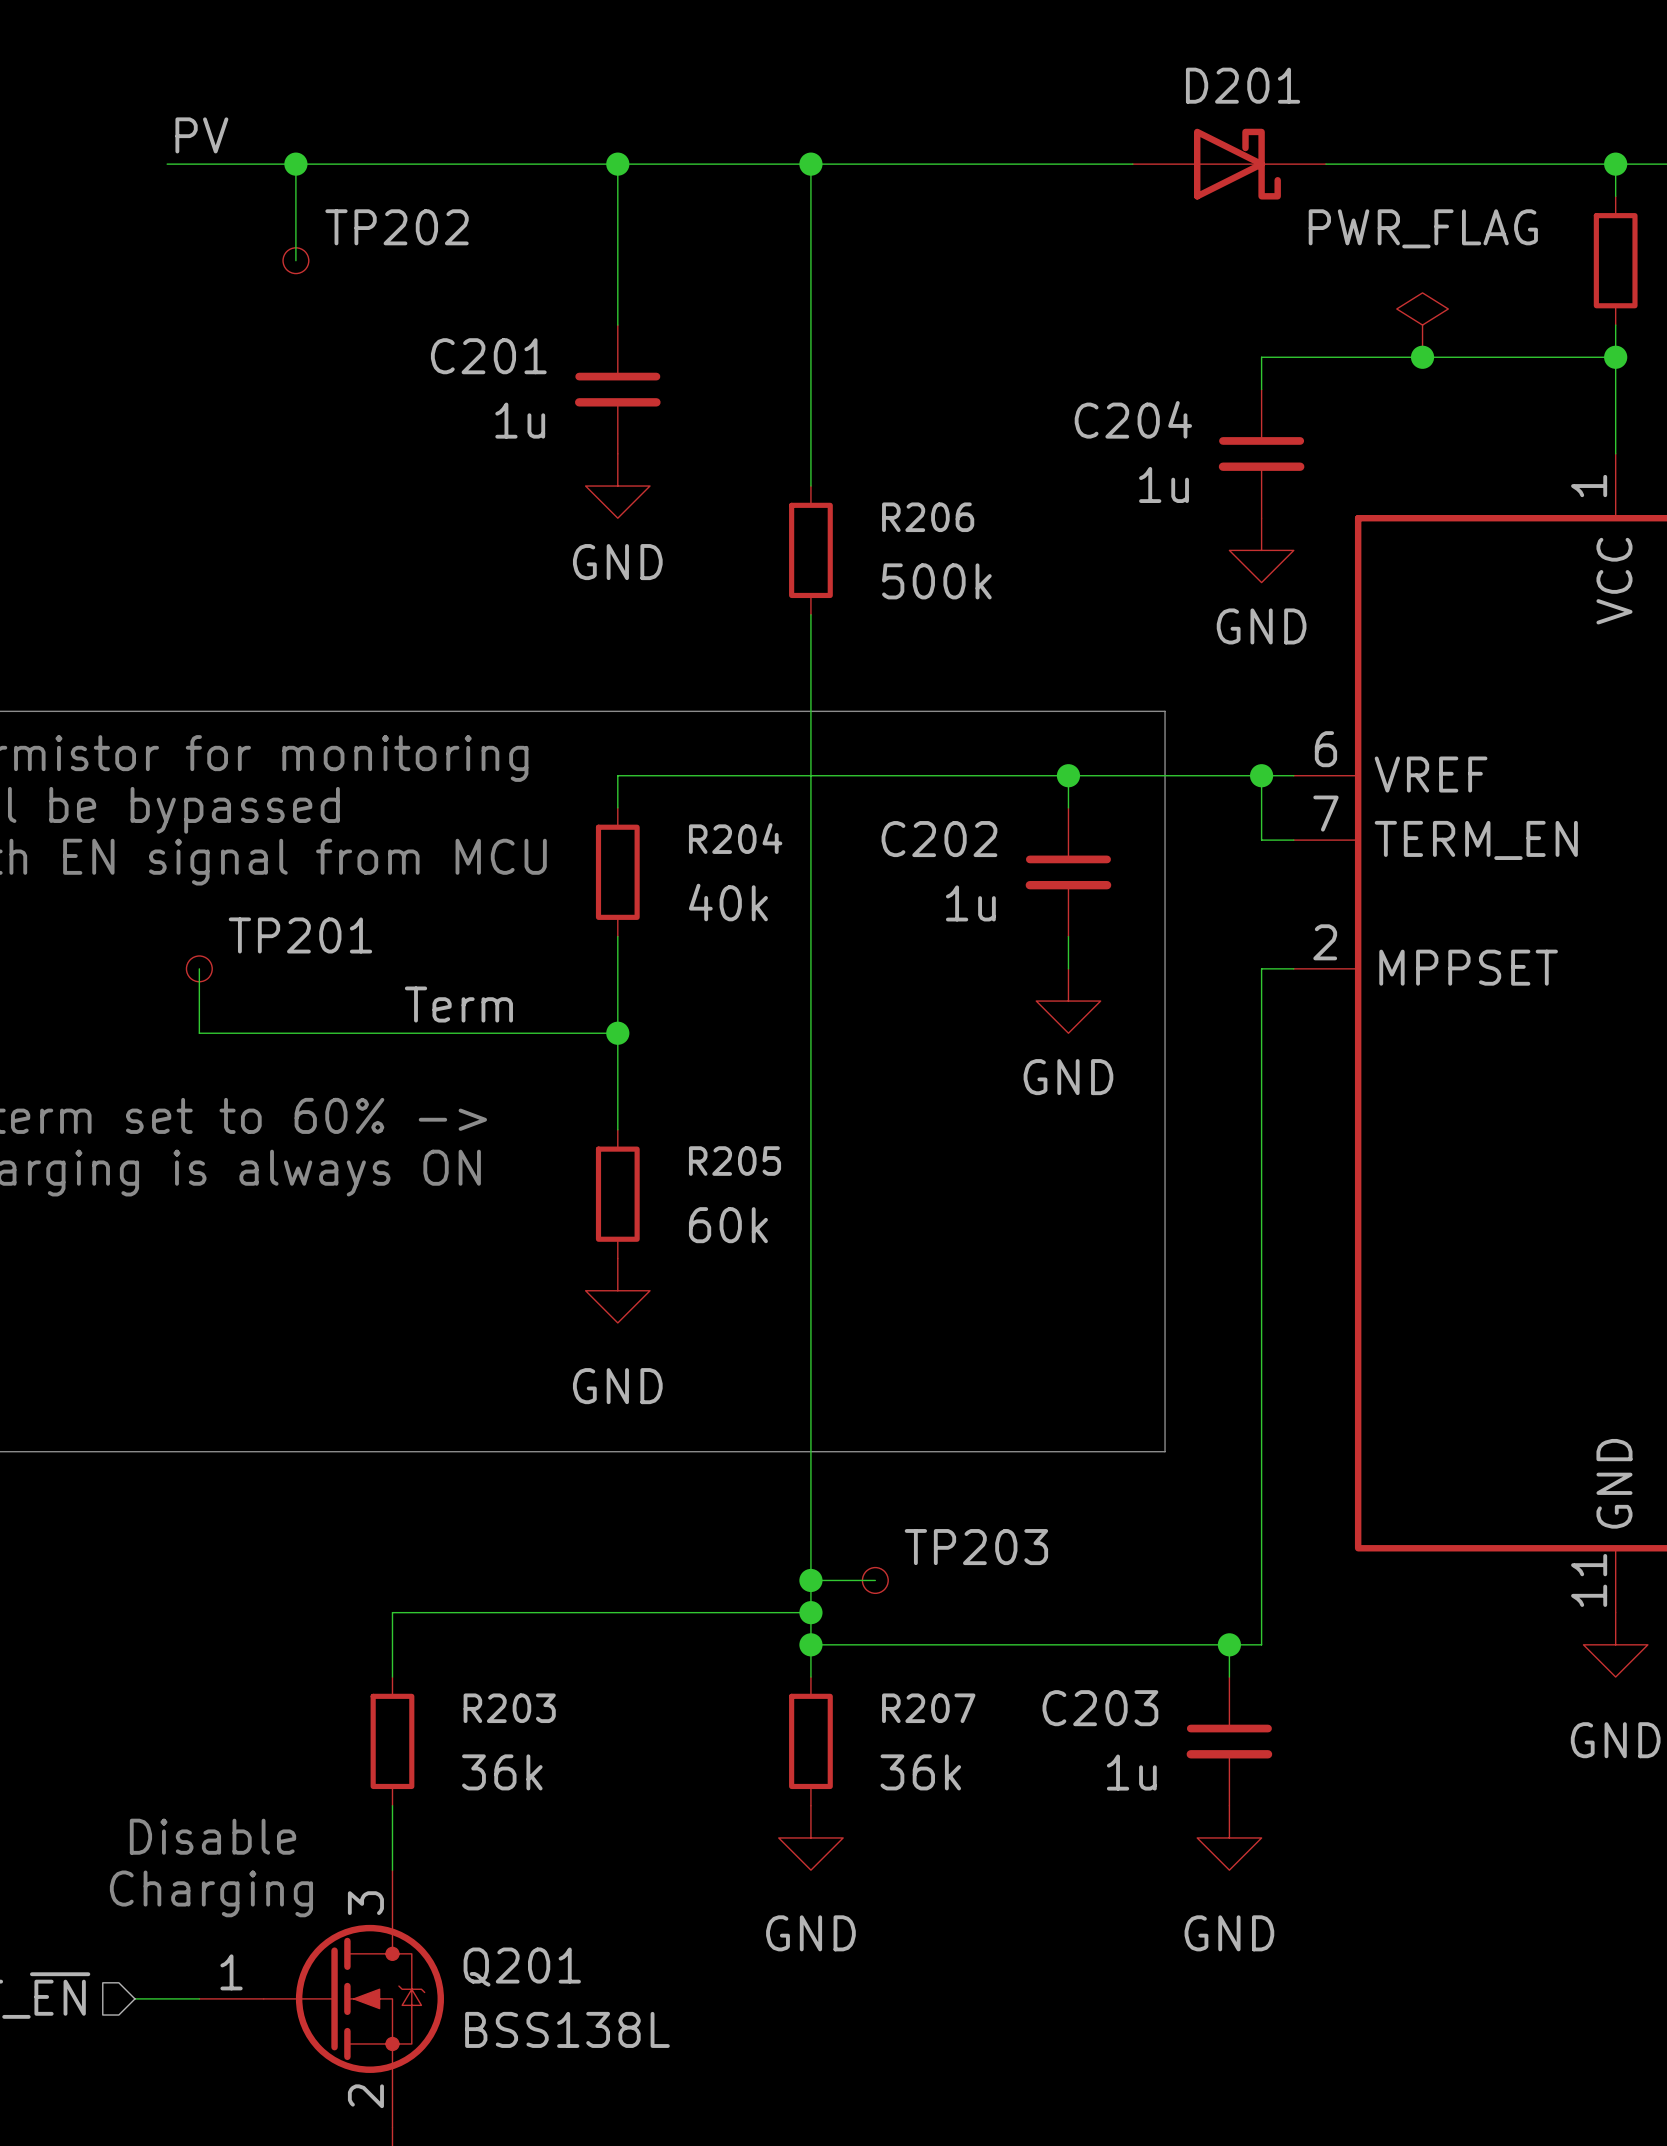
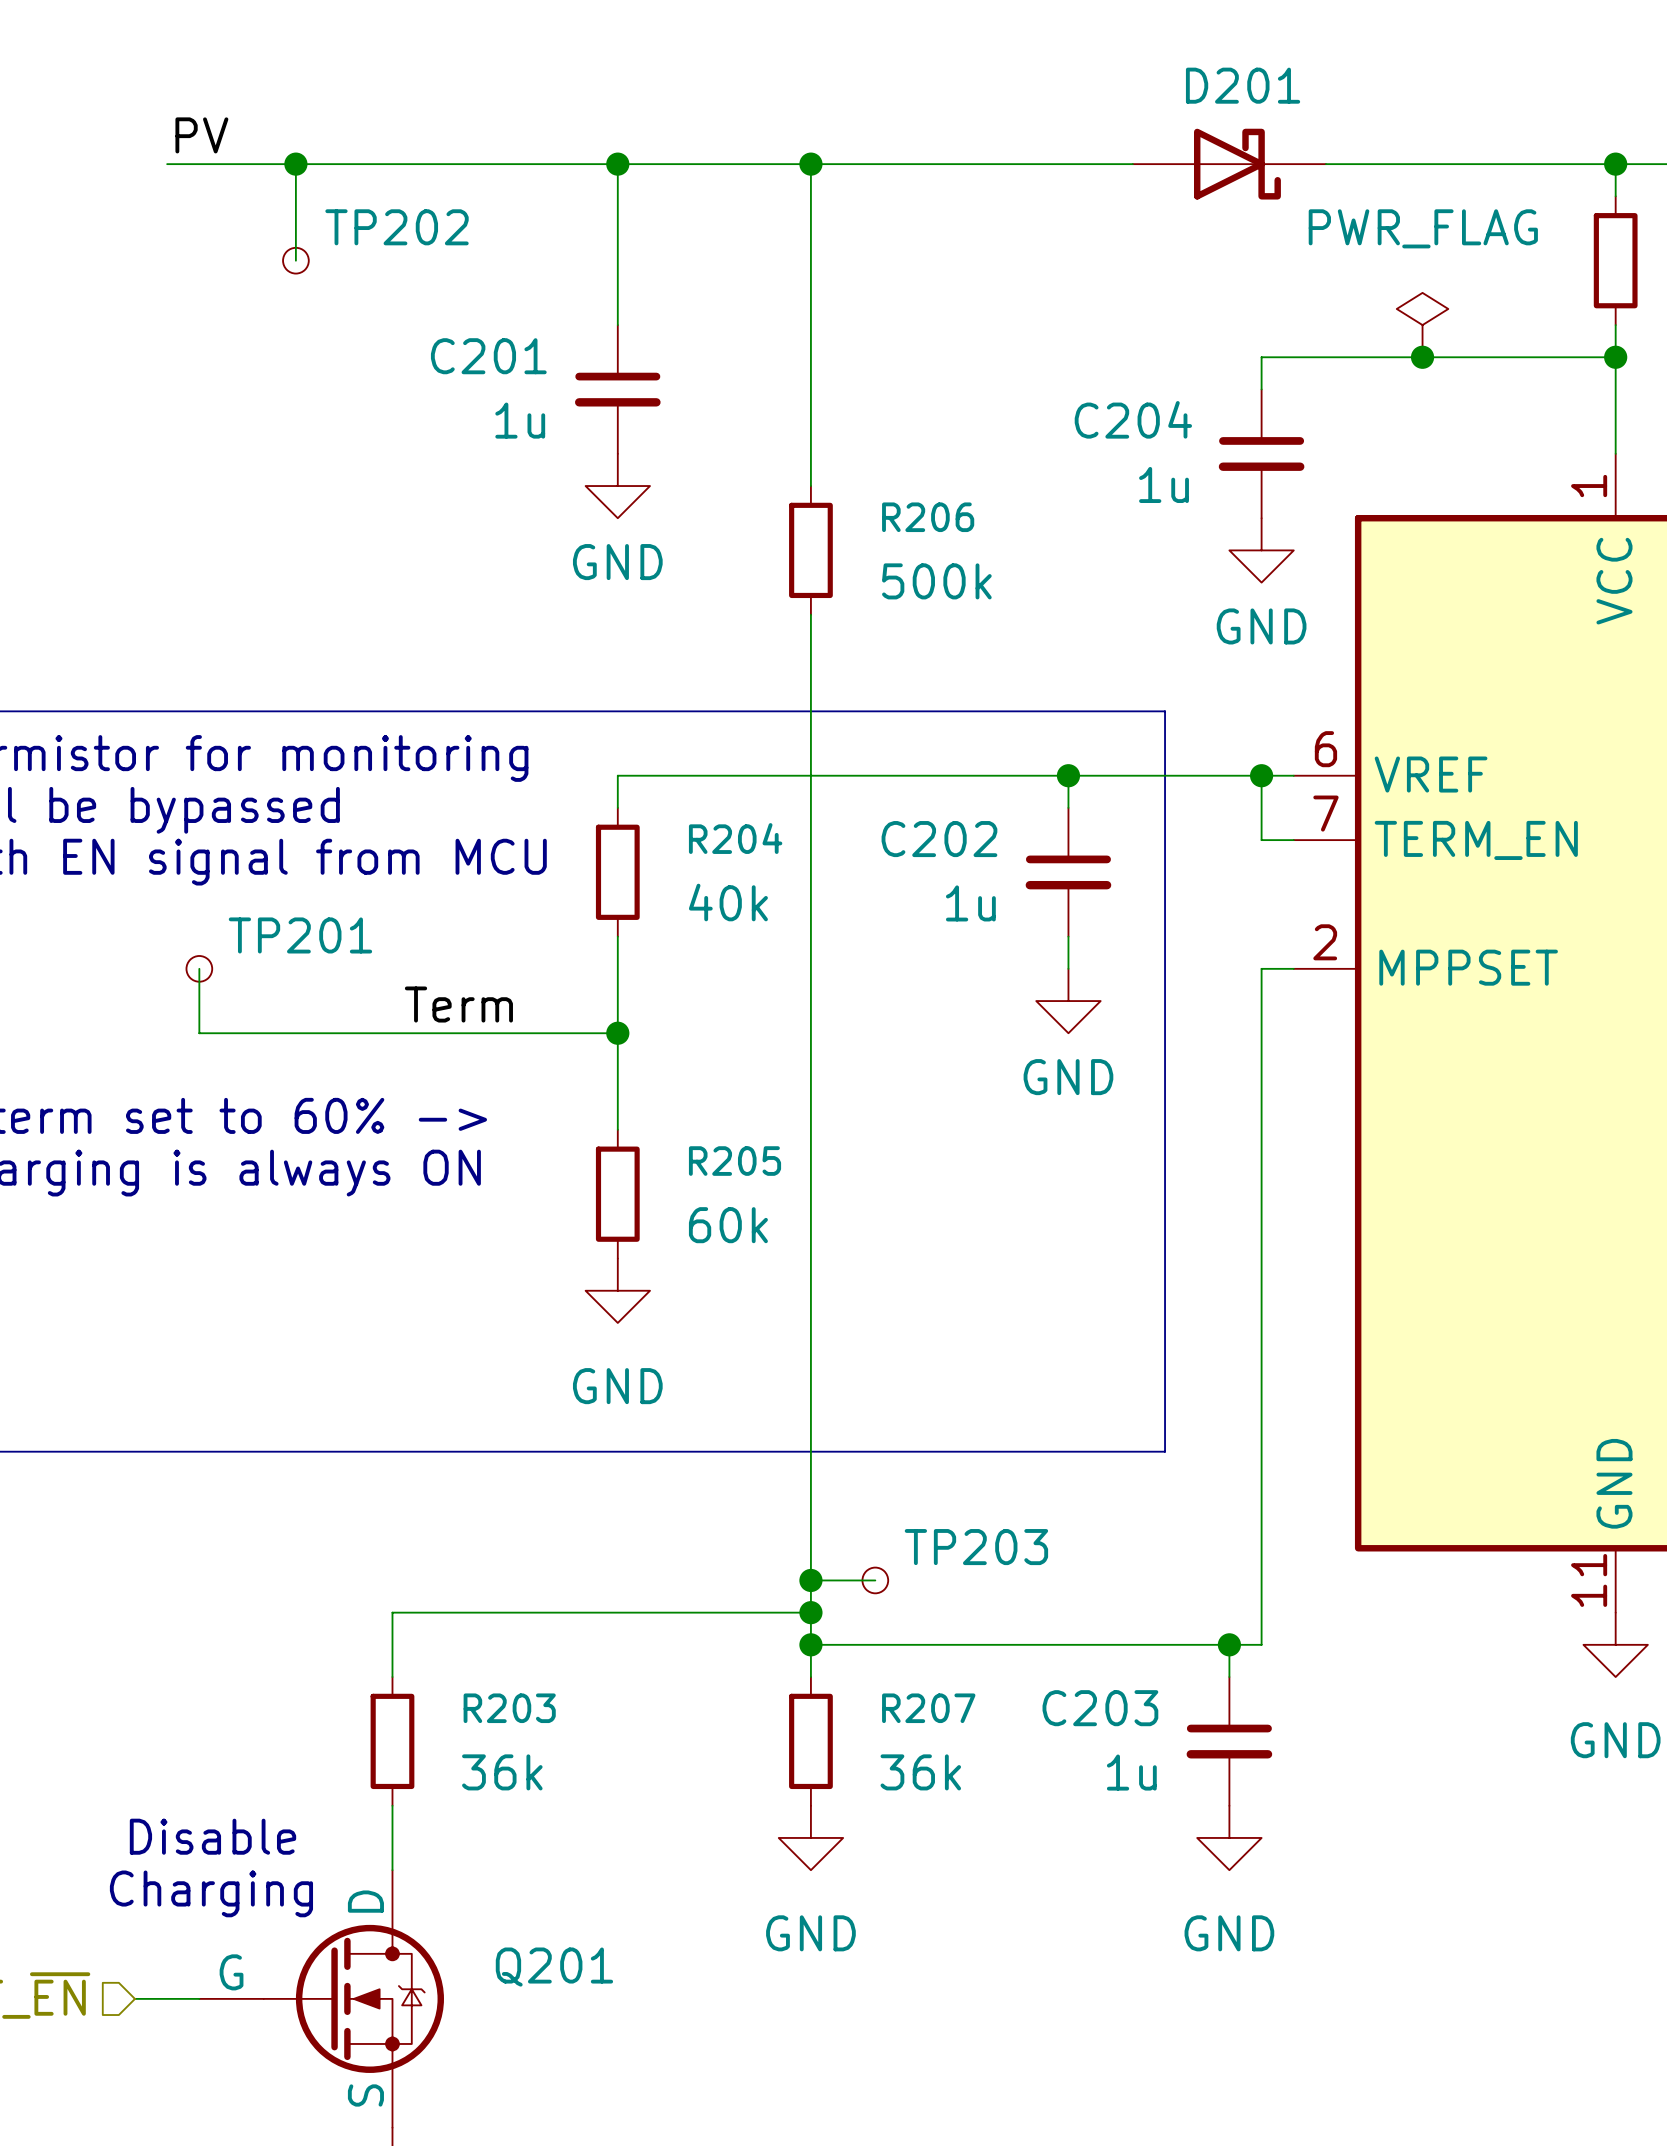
Q201 pin name: none -> D (365, 1901)
Q201 pin number: 3 (365, 1903) -> none
Q201 name position: Q201 (522, 1967) -> Q201 (554, 1967)
Q201 pin name: none -> G (231, 1972)
Q201 pin number: 1 (231, 1972) -> none
Q201 value: BSS138L (567, 2029) -> none
Q201 pin name: none -> S (365, 2095)
Q201 pin number: 2 (365, 2096) -> none

